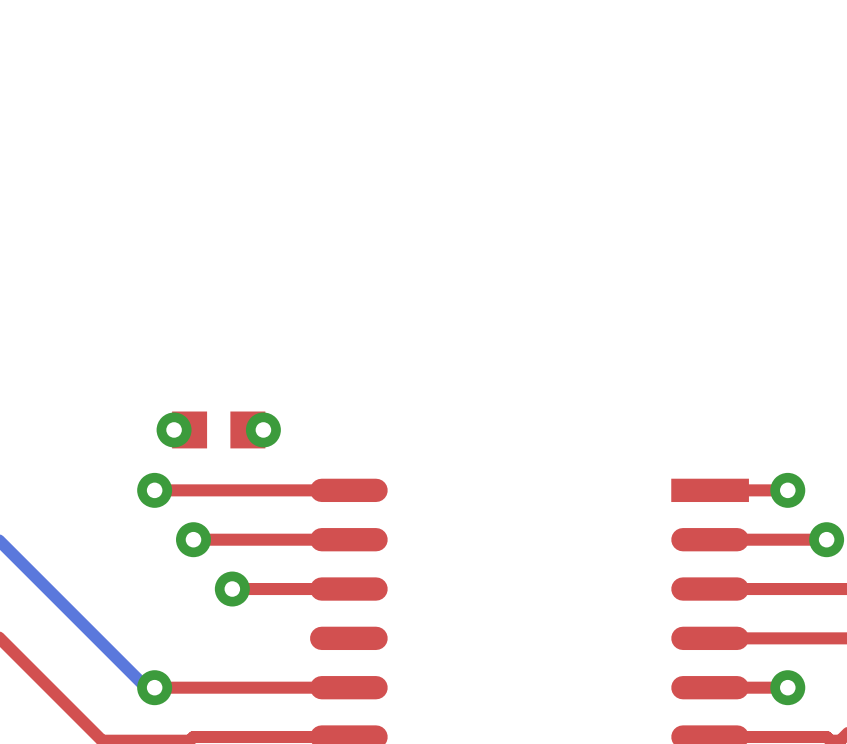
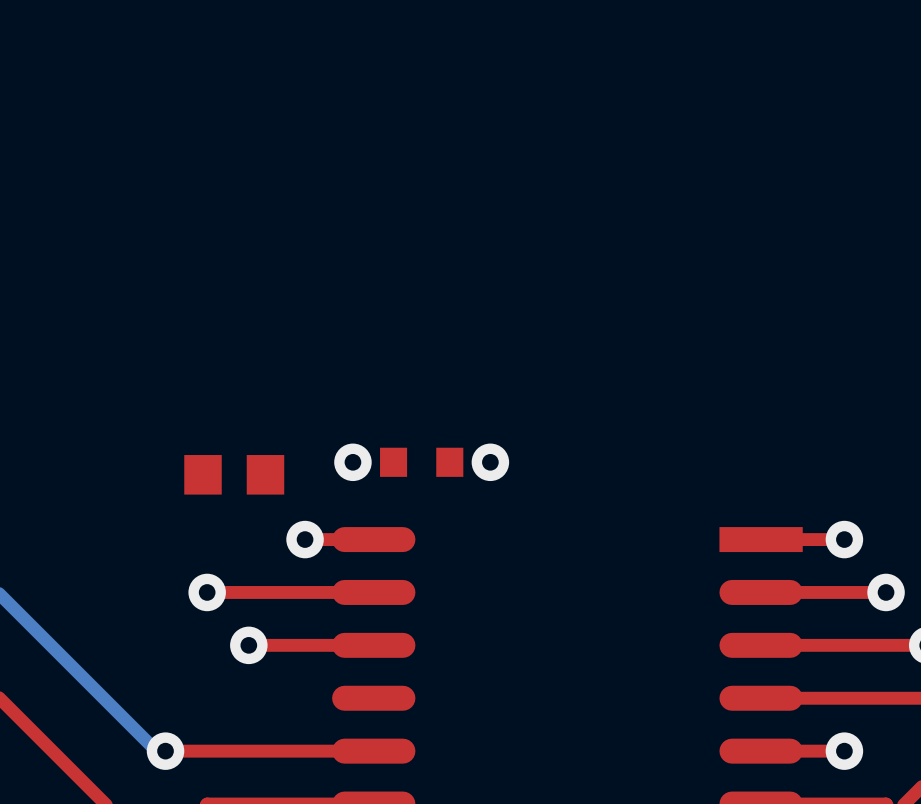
via: none -> (352, 462)
part: none -> (421, 462)
via: none -> (490, 462)
via: (174, 429) -> none
via: (263, 429) -> none
via: (154, 490) -> none
top track: (284, 490) (154, 490) -> none
via: none -> (305, 539)

